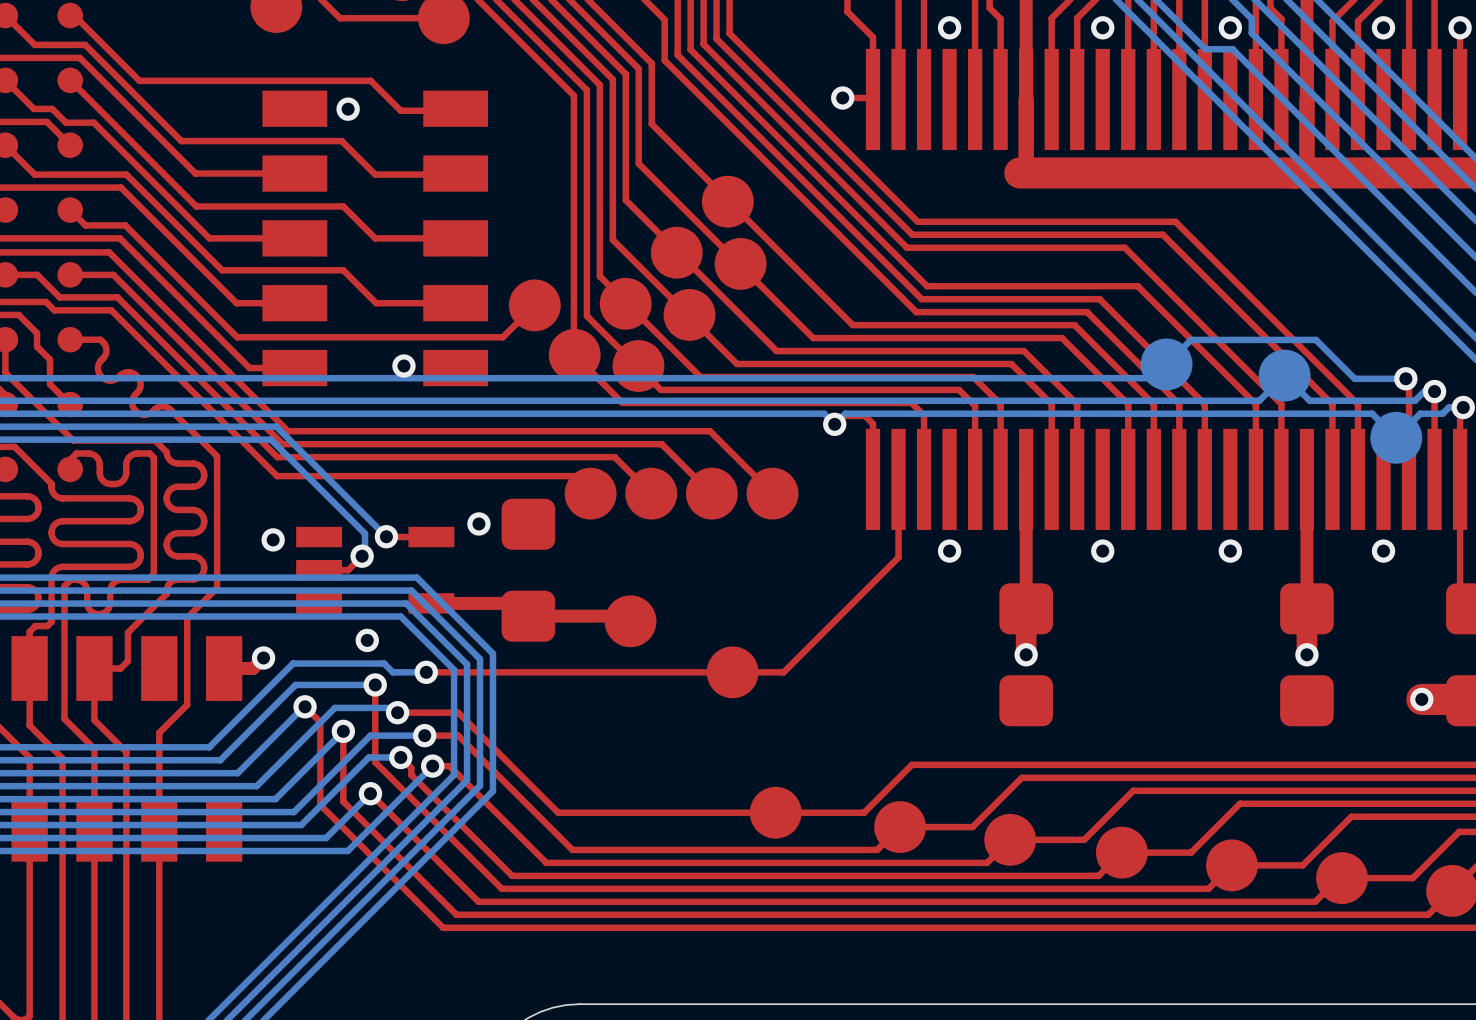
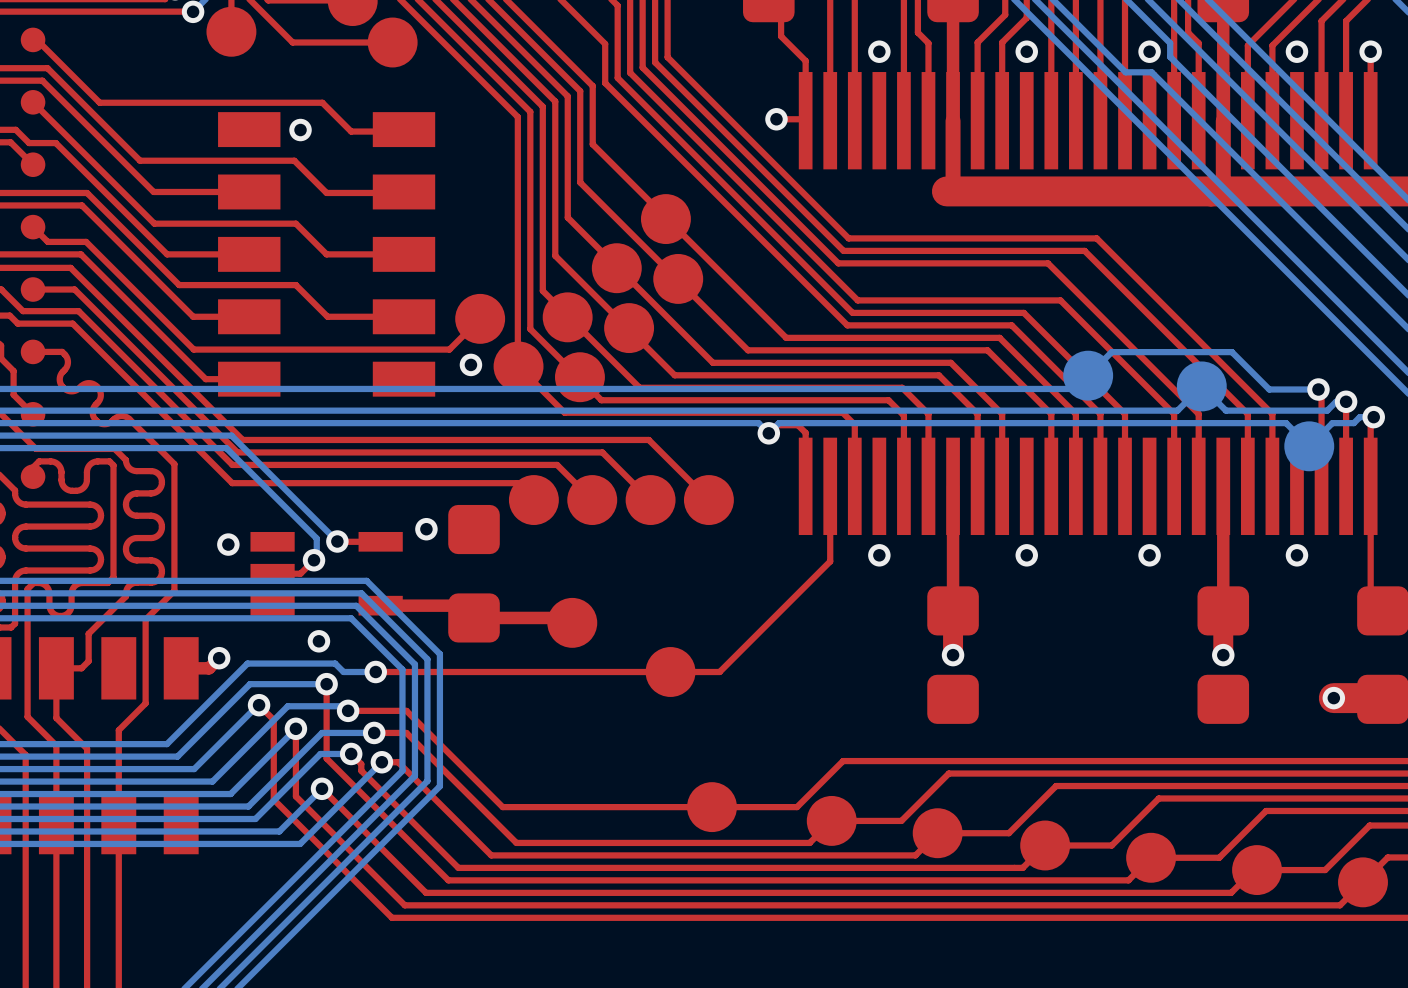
via position: (403, 366) -> (470, 364)

